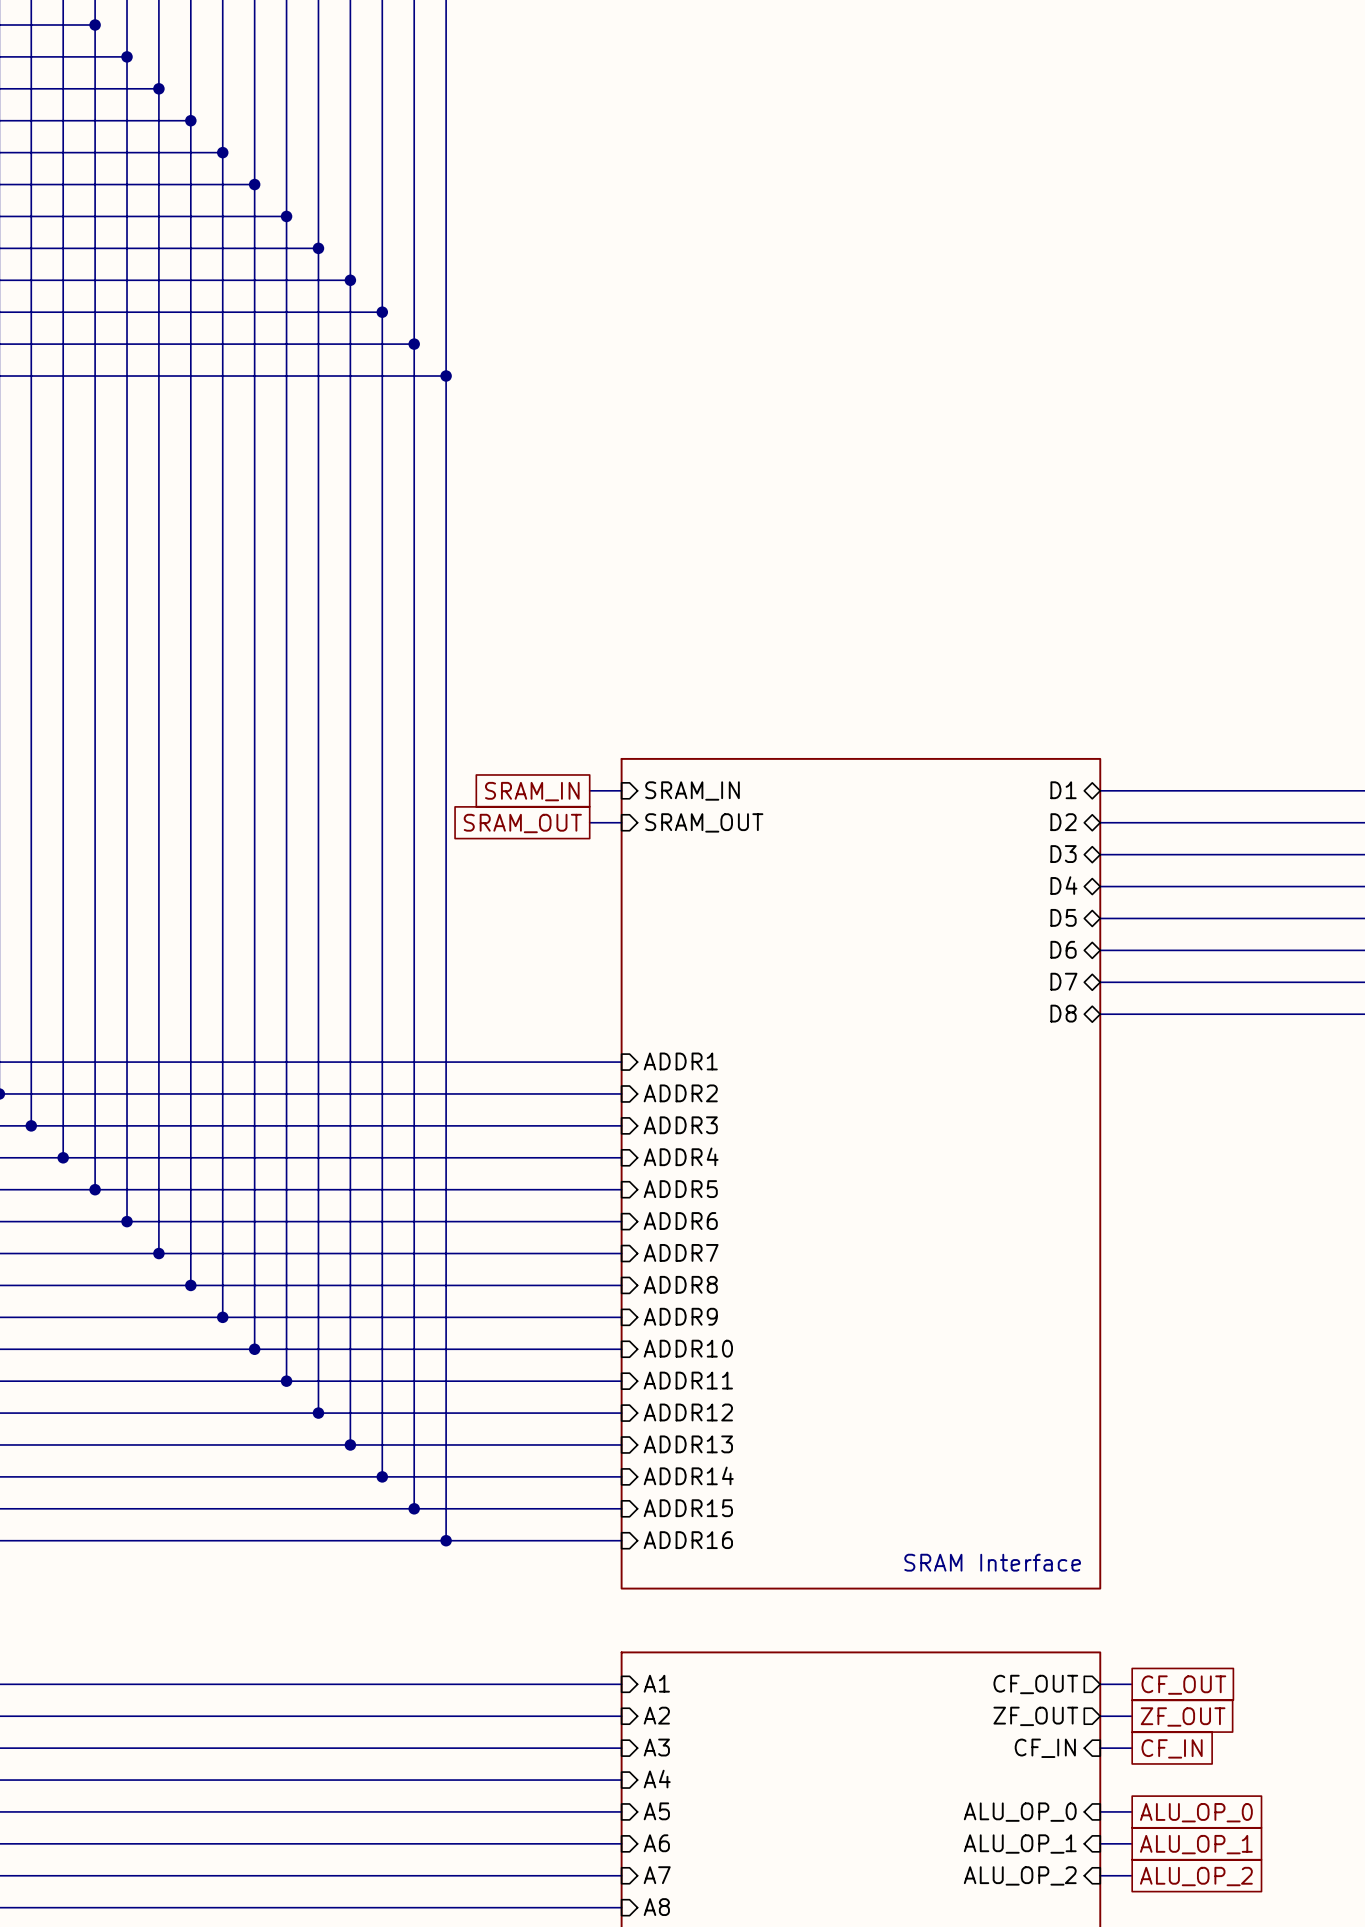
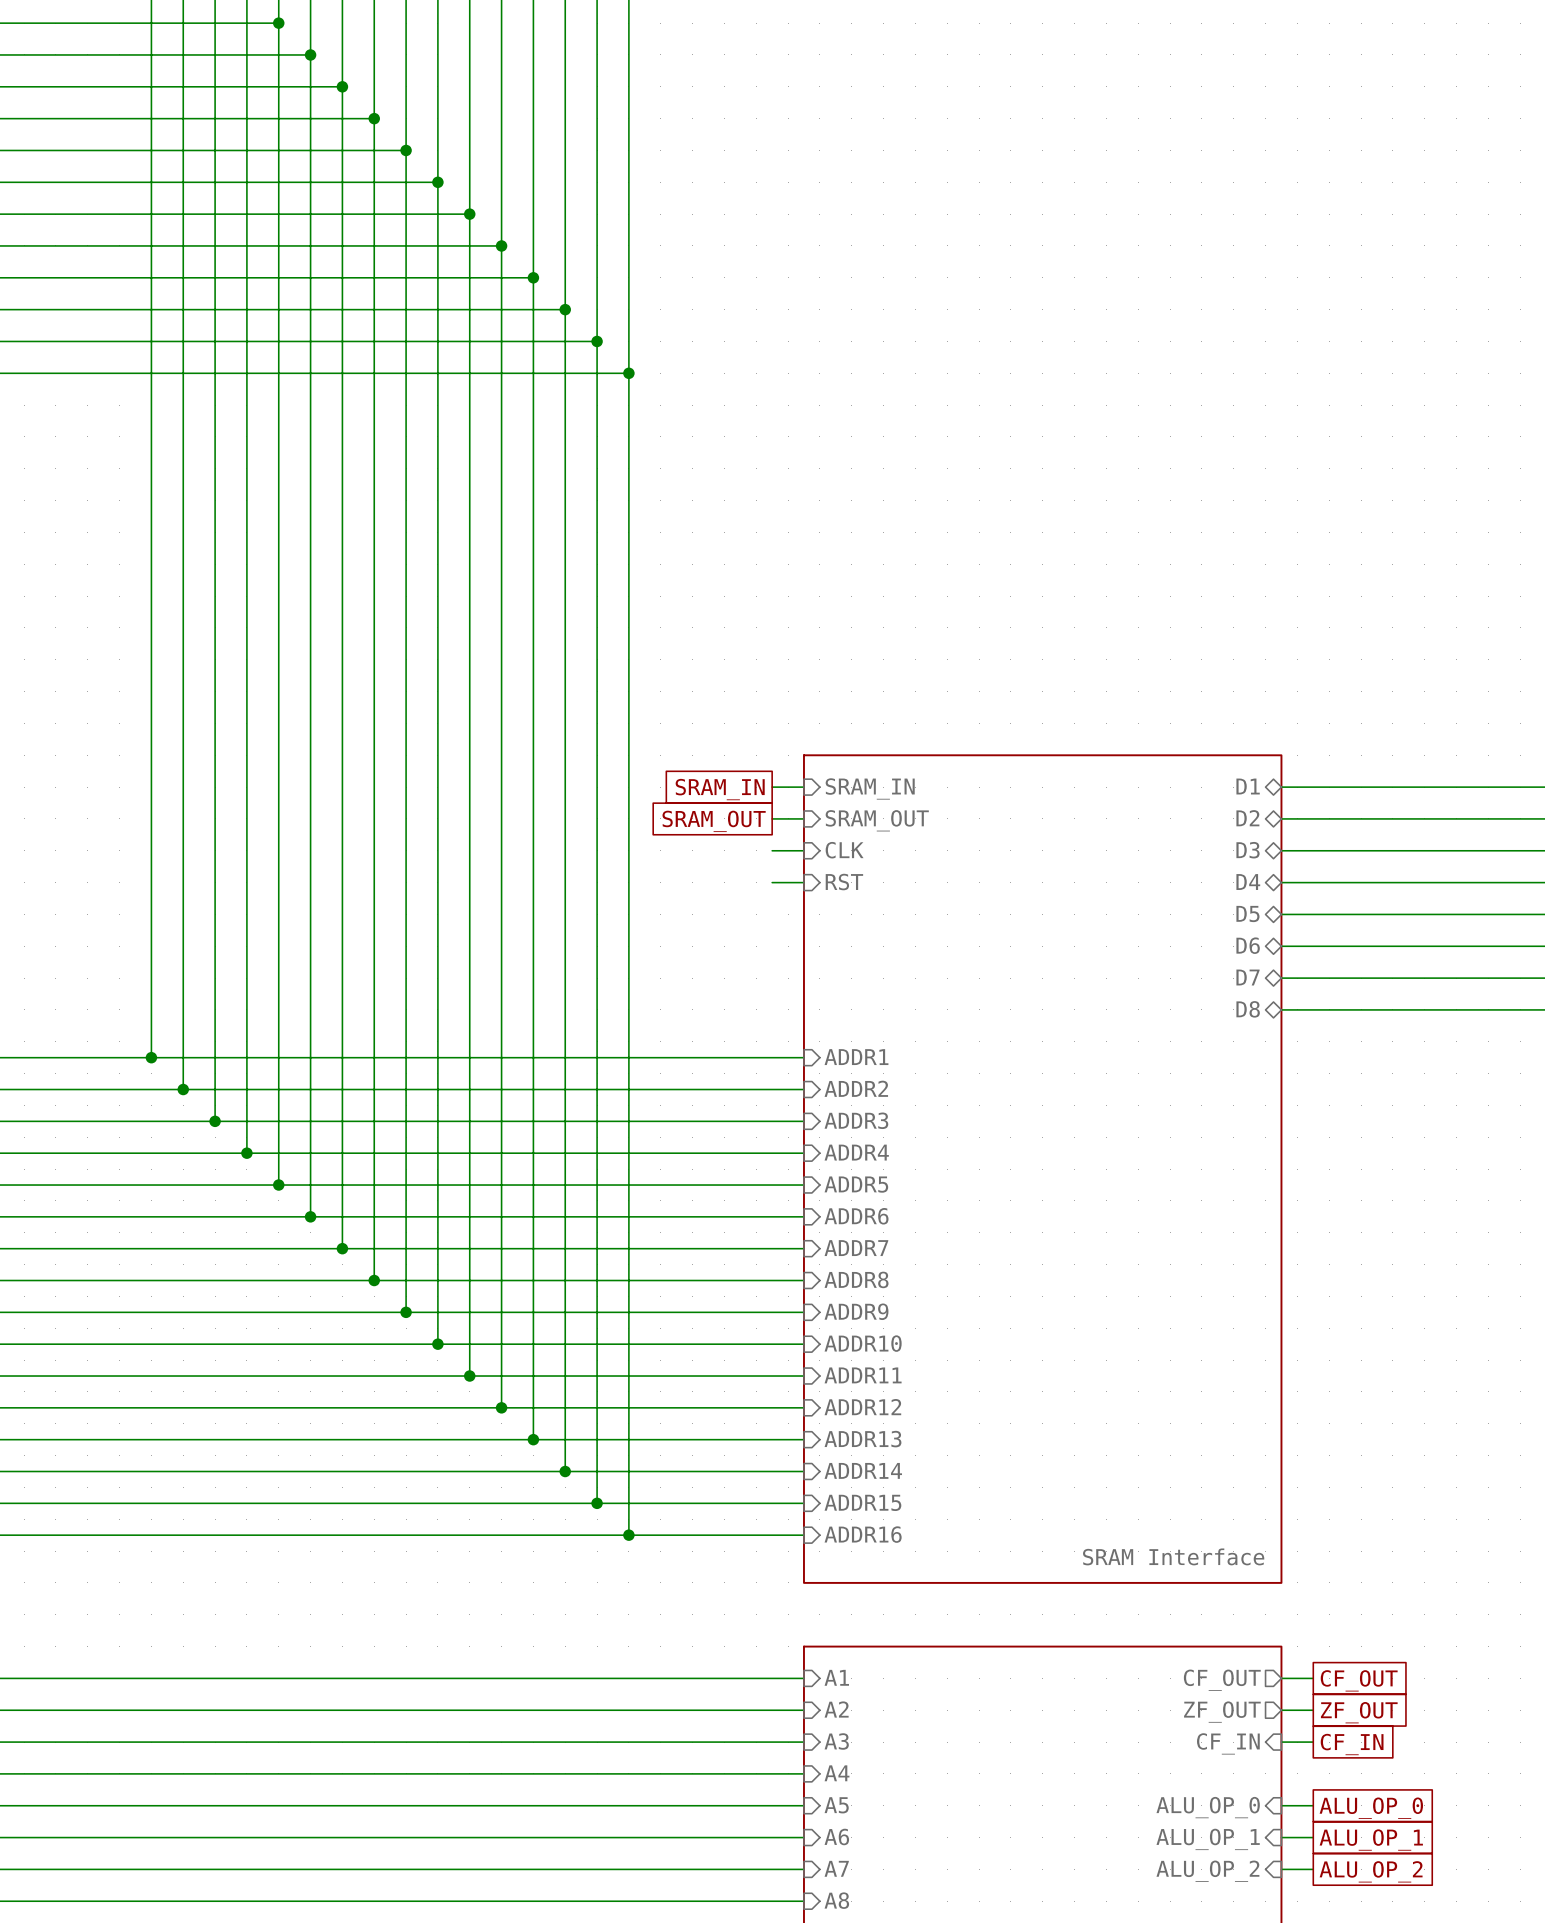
wire: none -> (772, 850) (803, 850)
sheet pin: none -> CLK (844, 850)
sheet pin: none -> RST (844, 882)
wire: none -> (772, 882) (803, 882)

